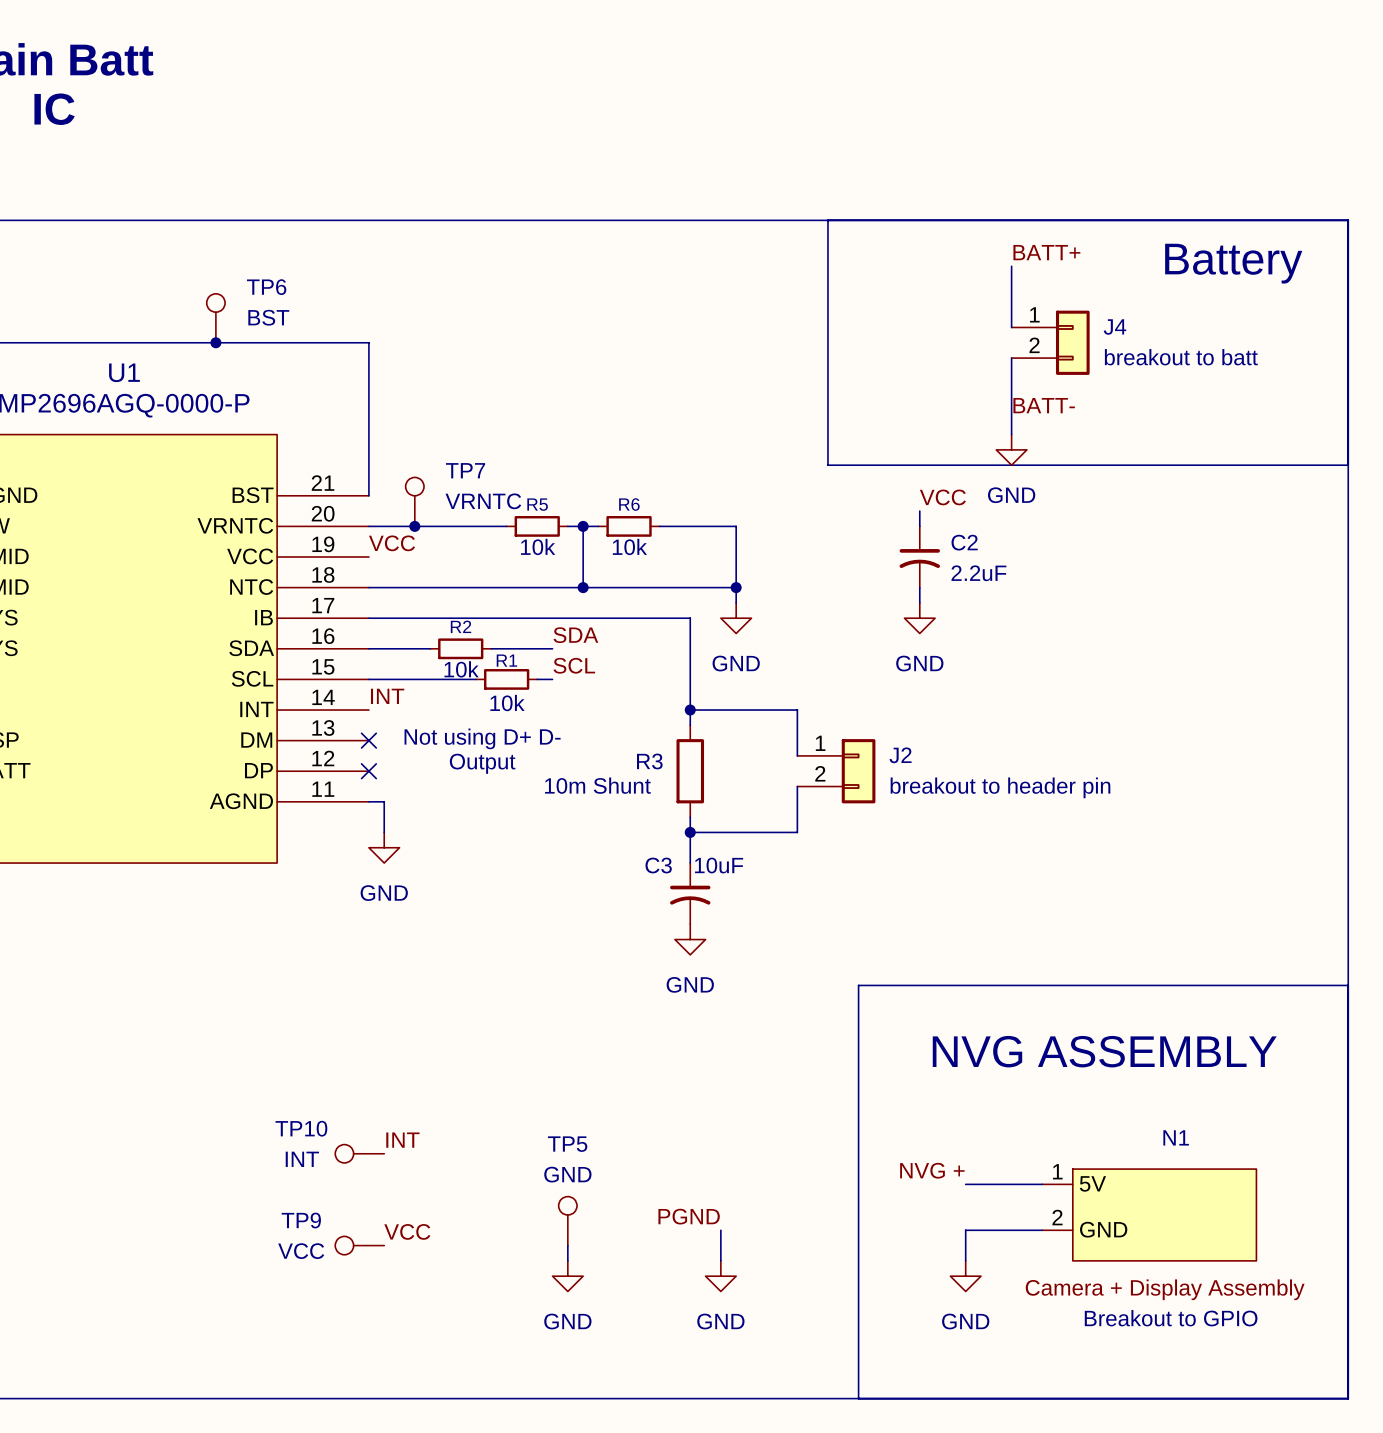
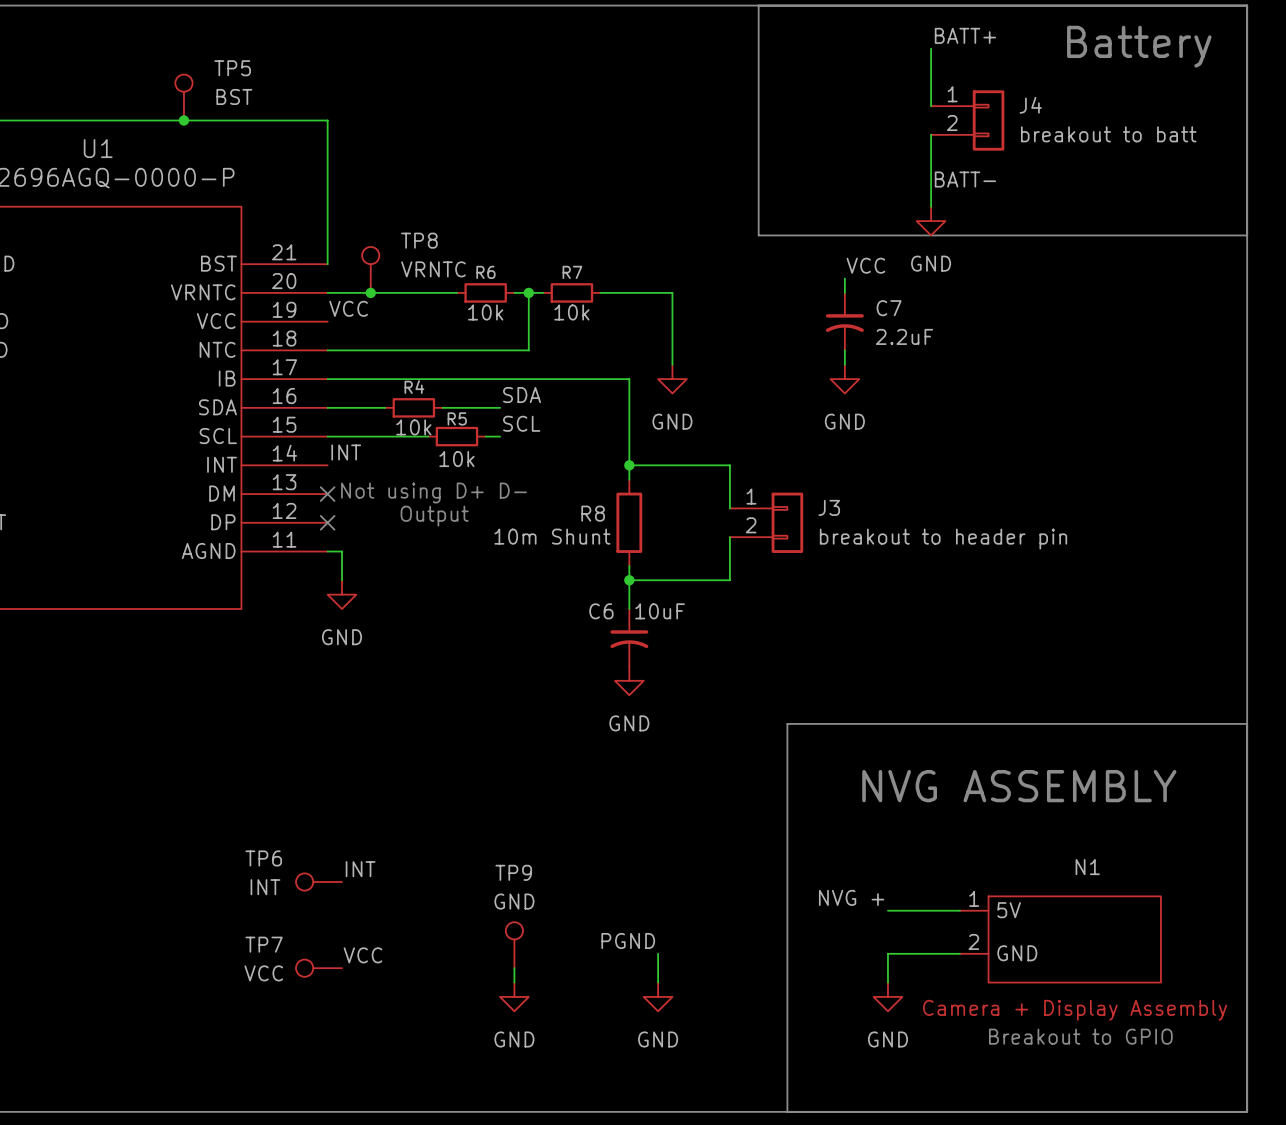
TP6 name: TP6 (266, 287) -> TP5 (232, 68)
TP7 name: TP7 (465, 470) -> TP8 (419, 240)
R5 name: R5 (537, 504) -> R6 (485, 272)
R6 name: R6 (629, 504) -> R7 (572, 272)
C2 name: C2 (964, 542) -> C7 (889, 308)
wire: (583, 587) (736, 587) -> none
junction: (583, 587) -> none
junction: (736, 587) -> none
R2 name: R2 (461, 626) -> R4 (414, 387)
R1 name: R1 (506, 660) -> R5 (457, 418)
J2 name: J2 (900, 755) -> J3 (829, 507)
R3 name: R3 (649, 761) -> R8 (593, 513)
C3 name: C3 (658, 865) -> C6 (601, 611)
TP10 name: TP10 (301, 1128) -> TP6 (263, 858)
TP5 name: TP5 (567, 1144) -> TP9 (513, 872)
TP9 name: TP9 (301, 1220) -> TP7 (264, 944)

